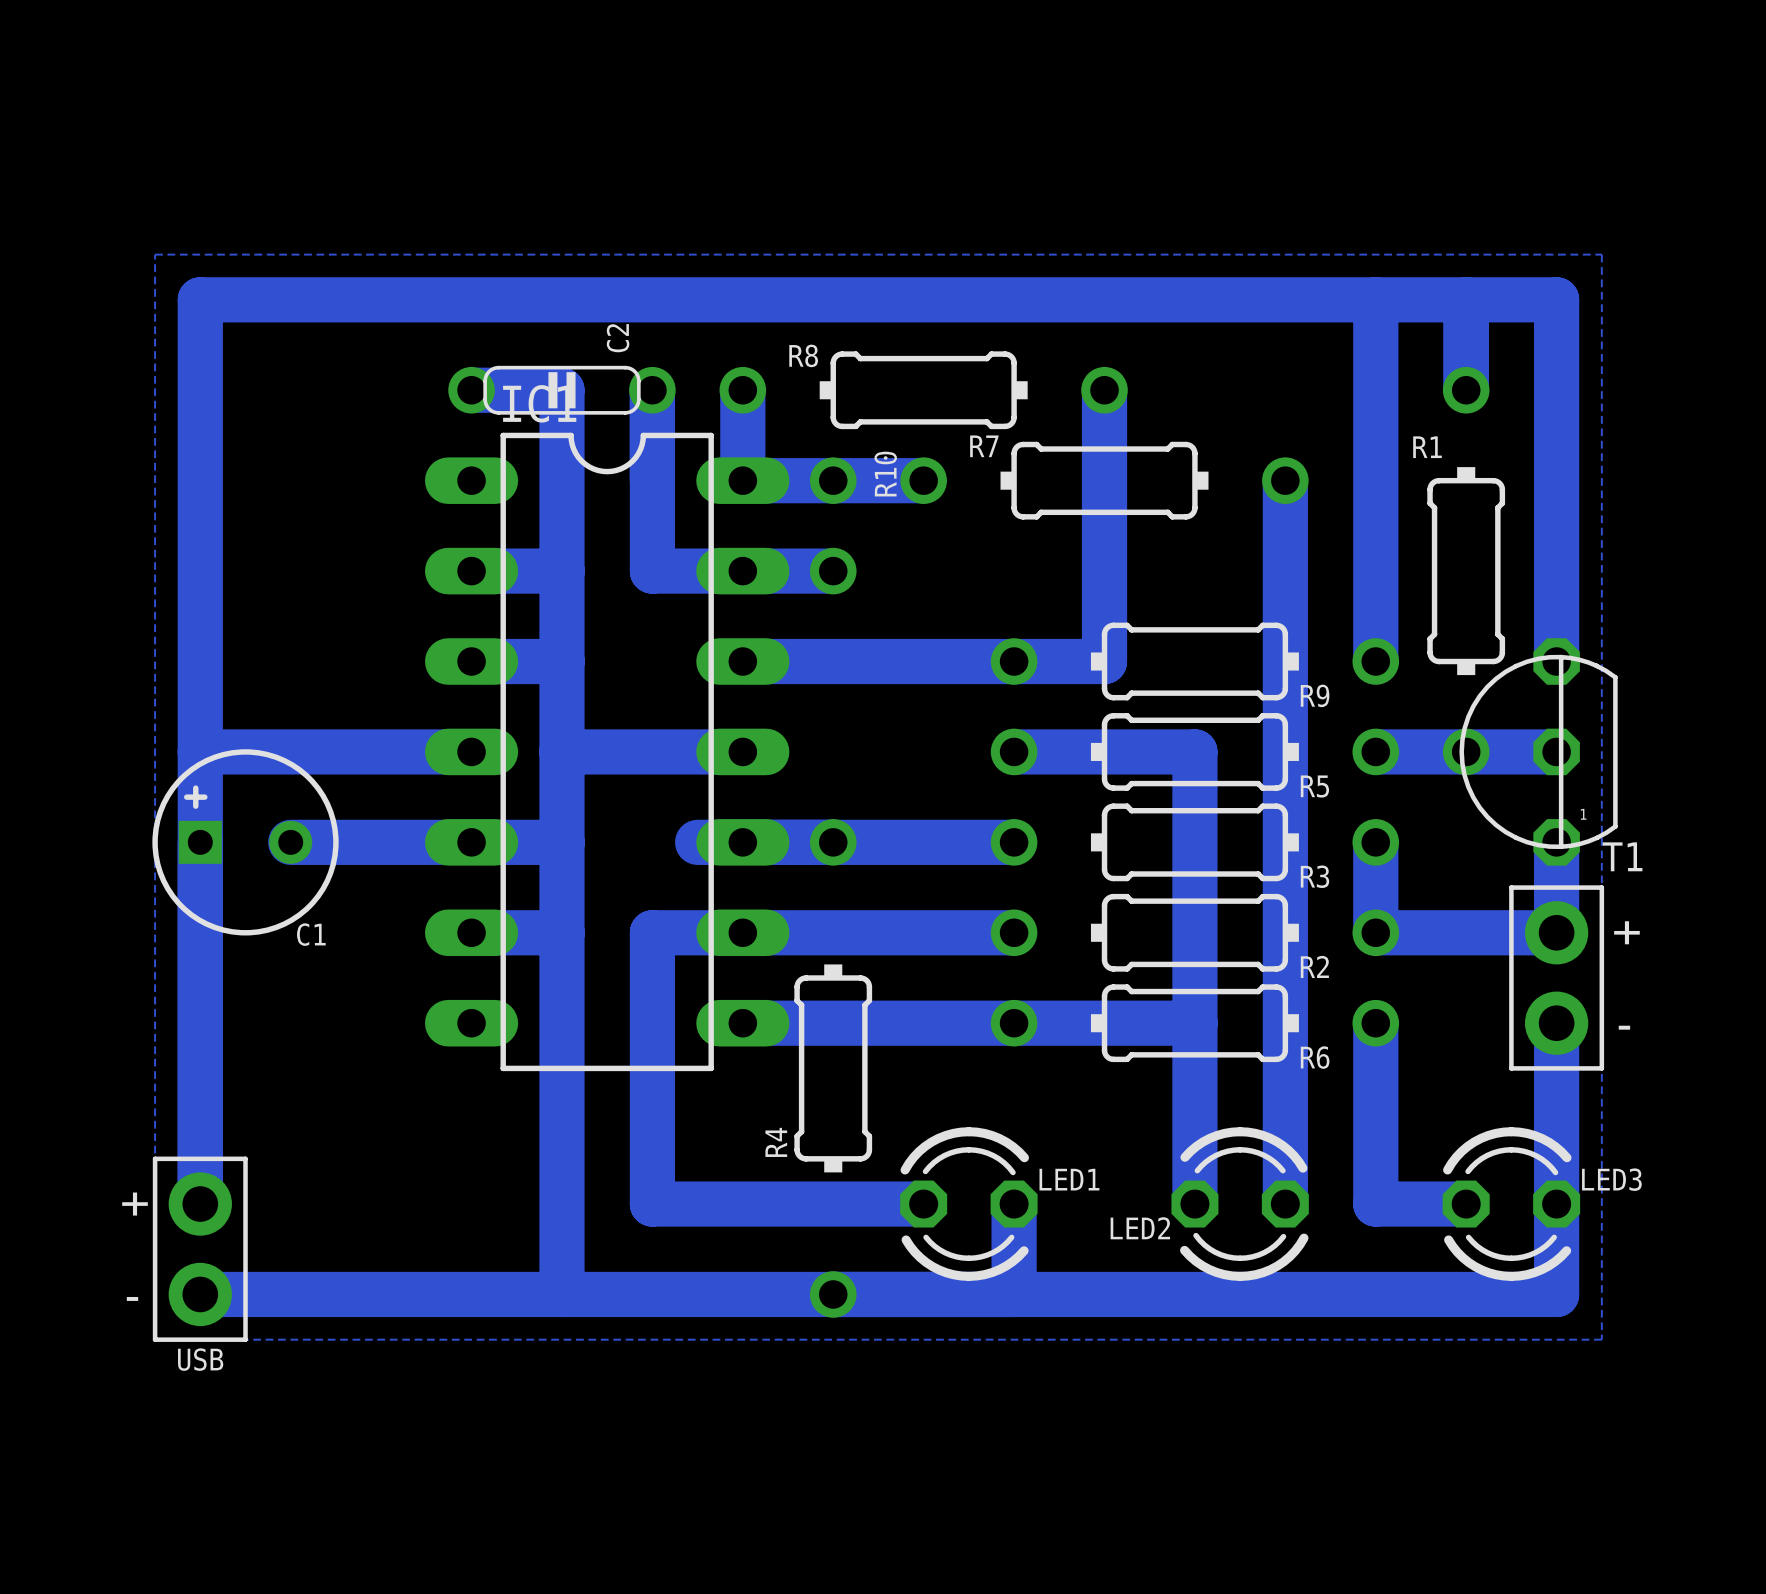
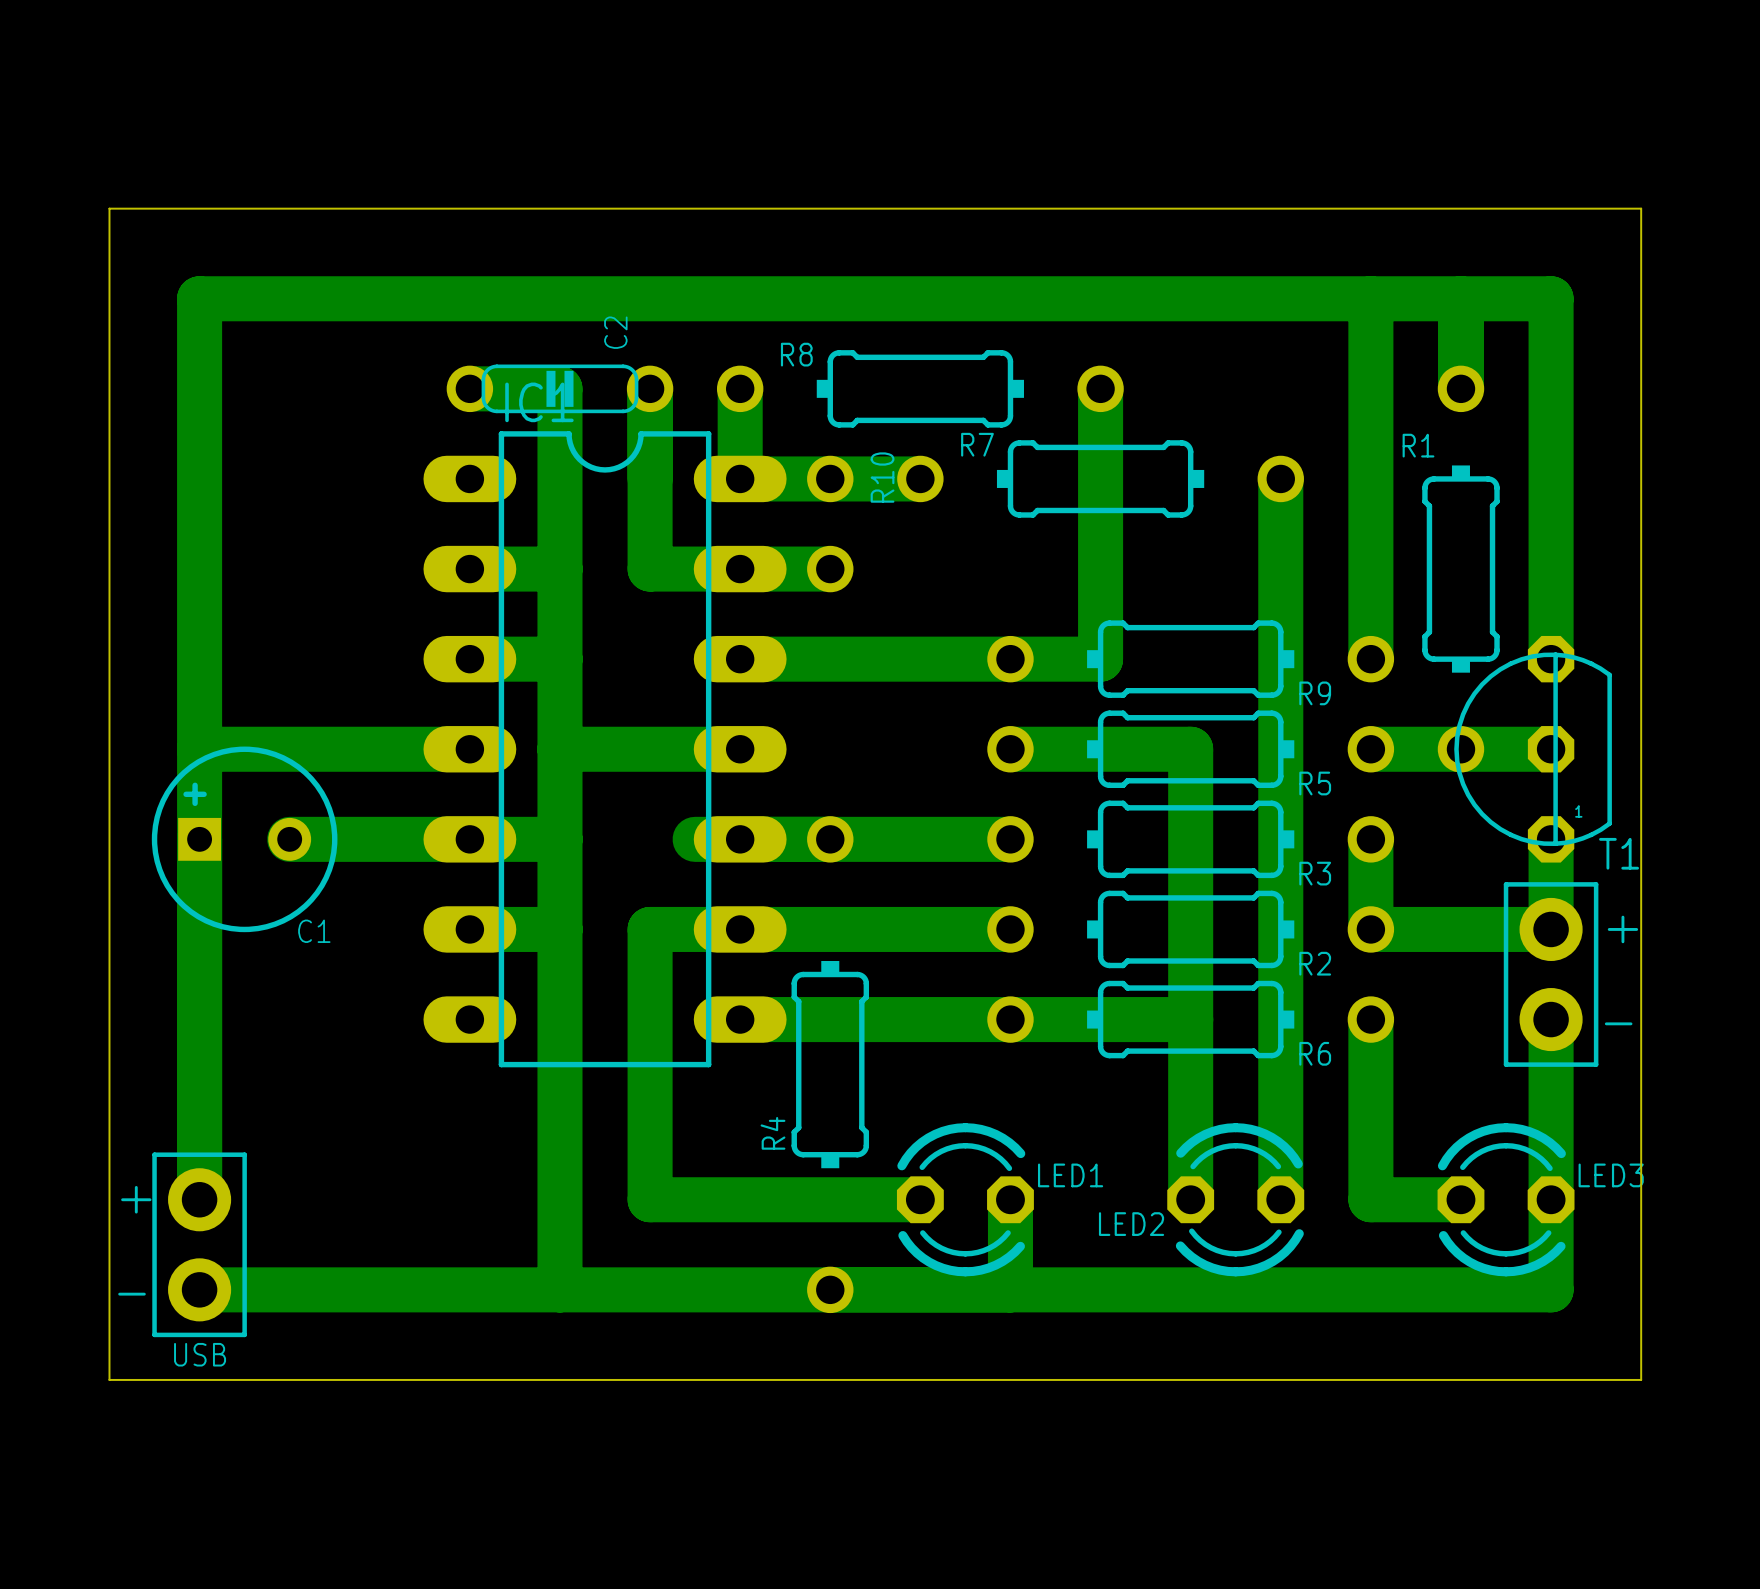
board edge: none -> (109, 208) (1641, 208) (1641, 1379) (109, 1379) (109, 208)
bottom zone outline: (155, 254) (155, 1339) (1601, 1339) (1601, 254) (155, 254) -> none

